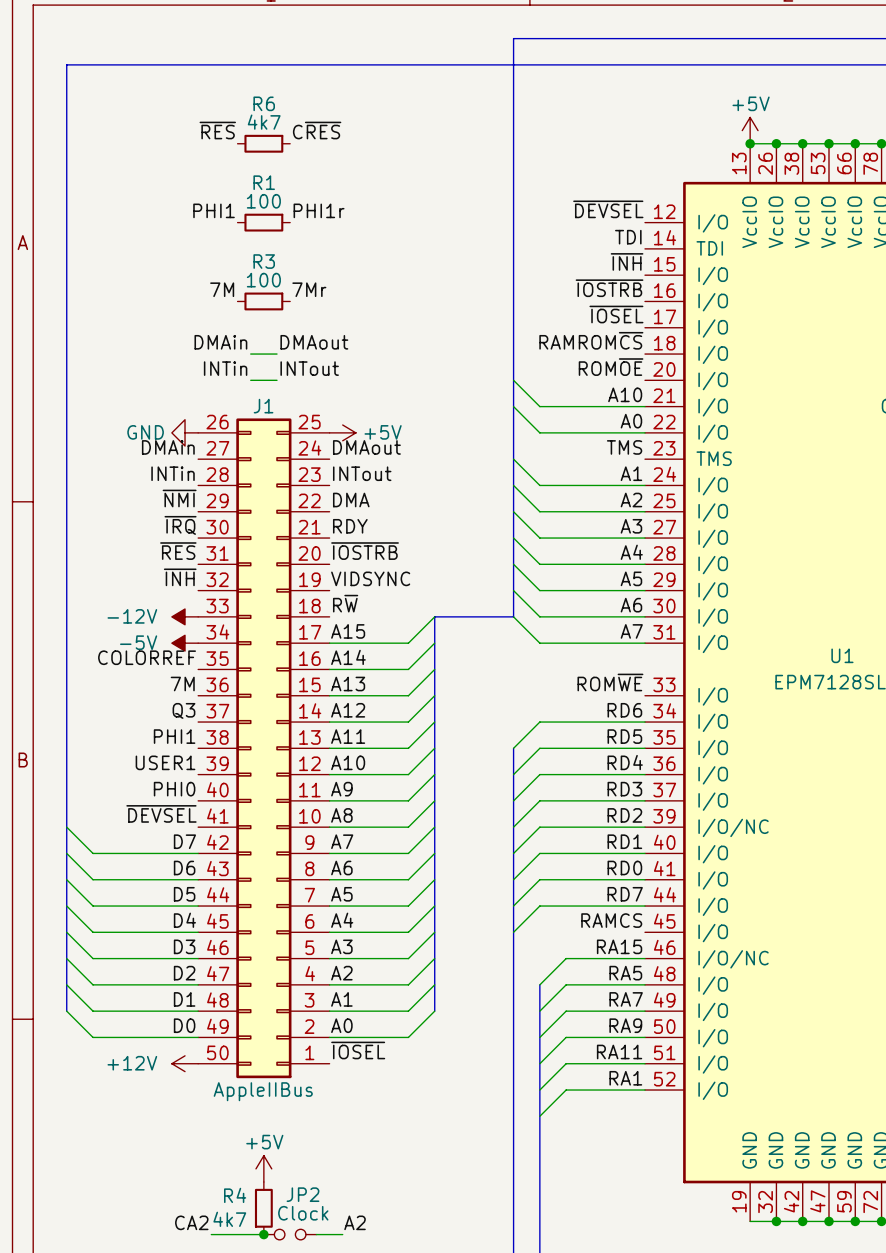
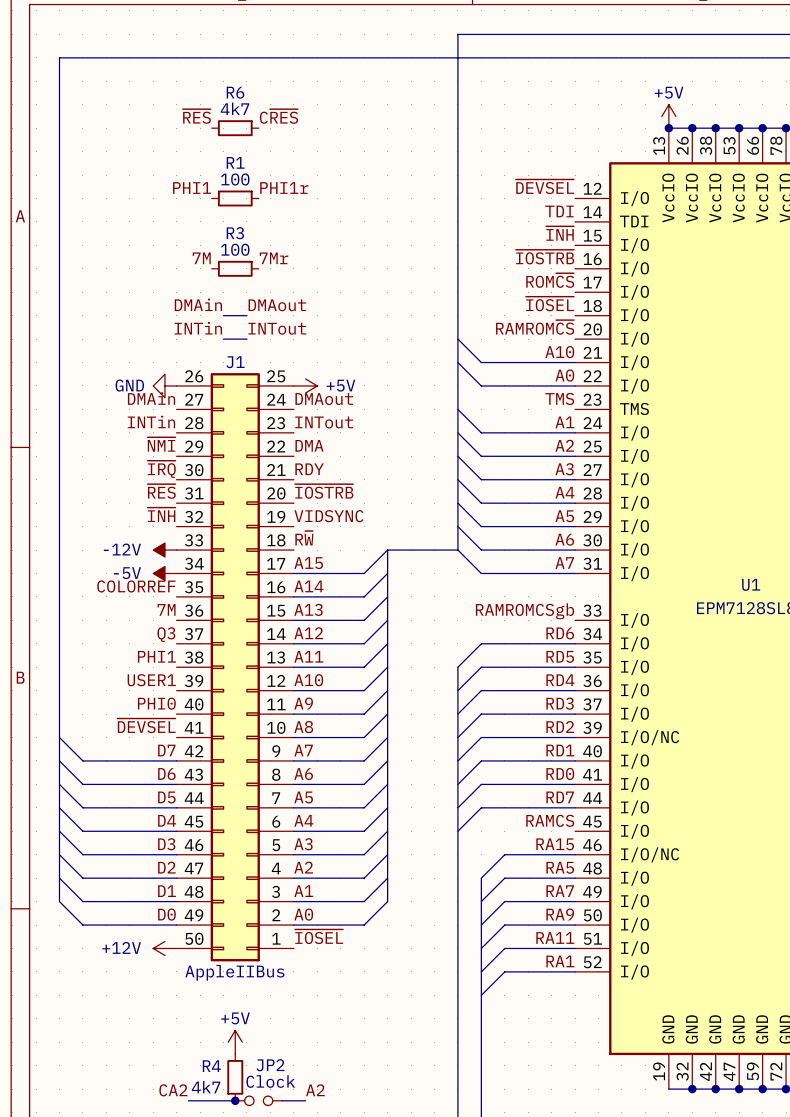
label: ~{IOSEL} (616, 314) -> ROM~{CS} (550, 280)
label: RAMROM~{CS} (591, 340) -> ~{IOSEL} (549, 303)
label: ROM~{OE} (611, 367) -> RAMROM~{CS} (535, 327)
label: ROM~{WE} (610, 682) -> RAMROMCSgb (524, 611)

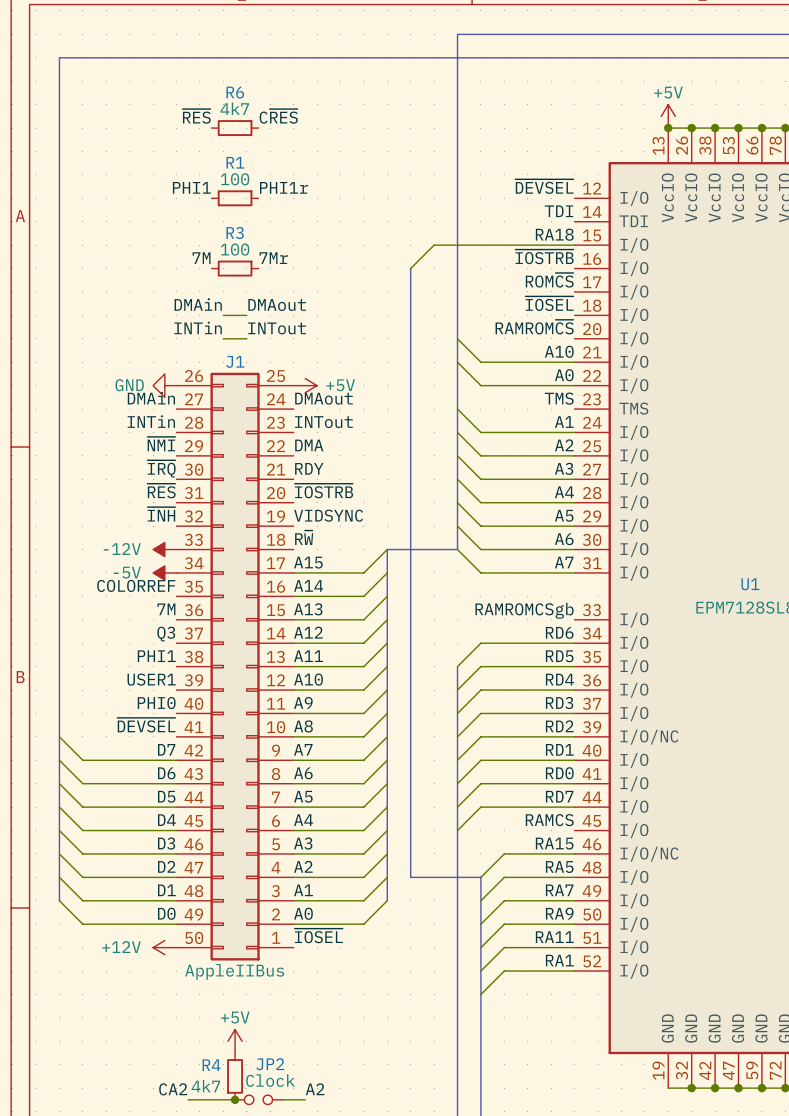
label: ~{INH} (560, 233) -> RA18 (554, 234)
wire: none -> (574, 245) (434, 245) (410, 268)
bus: none -> (410, 268) (410, 877) (480, 877)

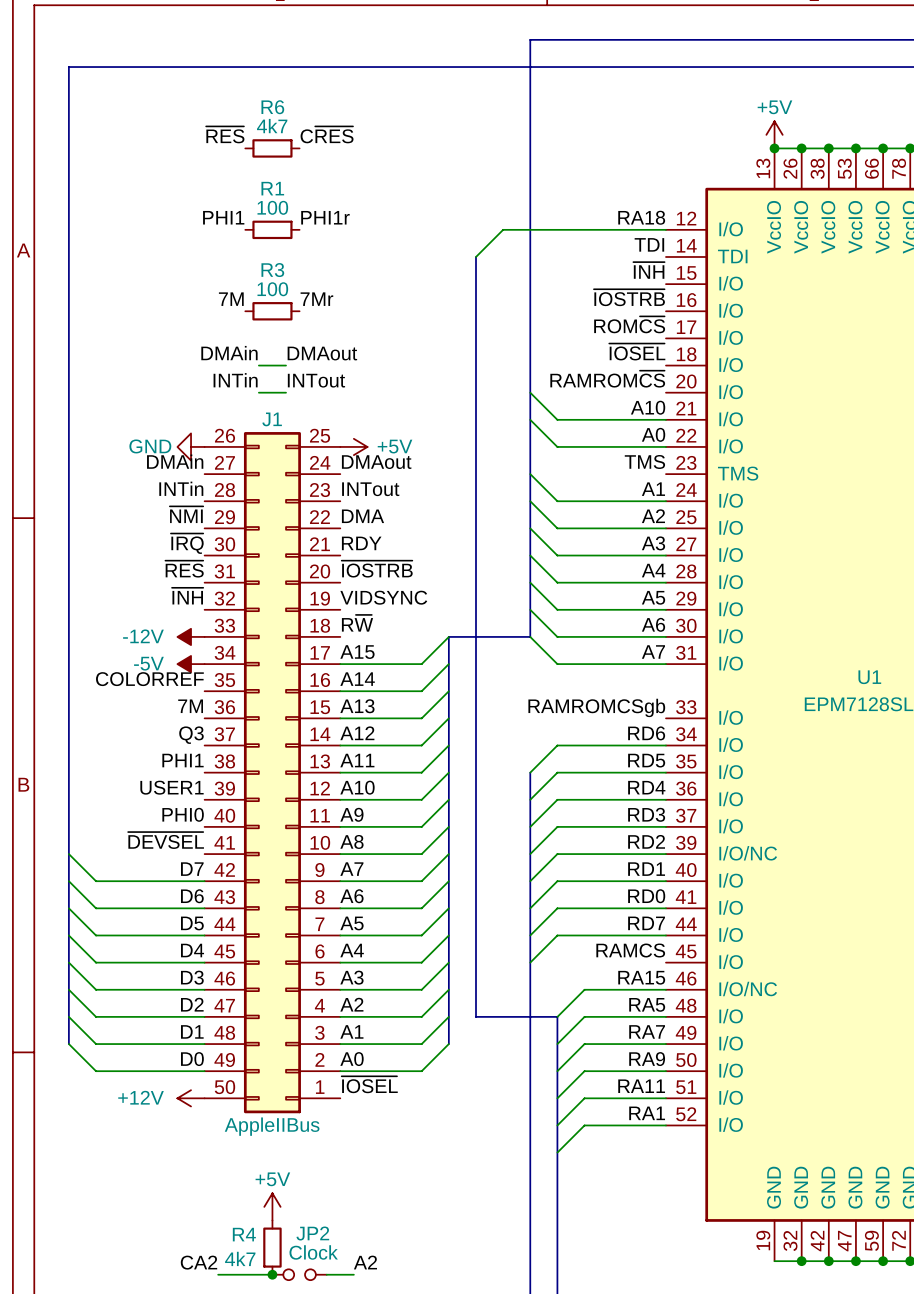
label: ~{DEVSEL} (544, 186) -> RA18 (641, 217)
bus: none -> (476, 256) (476, 311)
label: RA18 (554, 234) -> ~{INH} (648, 270)
wire: (574, 245) (434, 245) (410, 268) -> (665, 229) (503, 229) (476, 256)

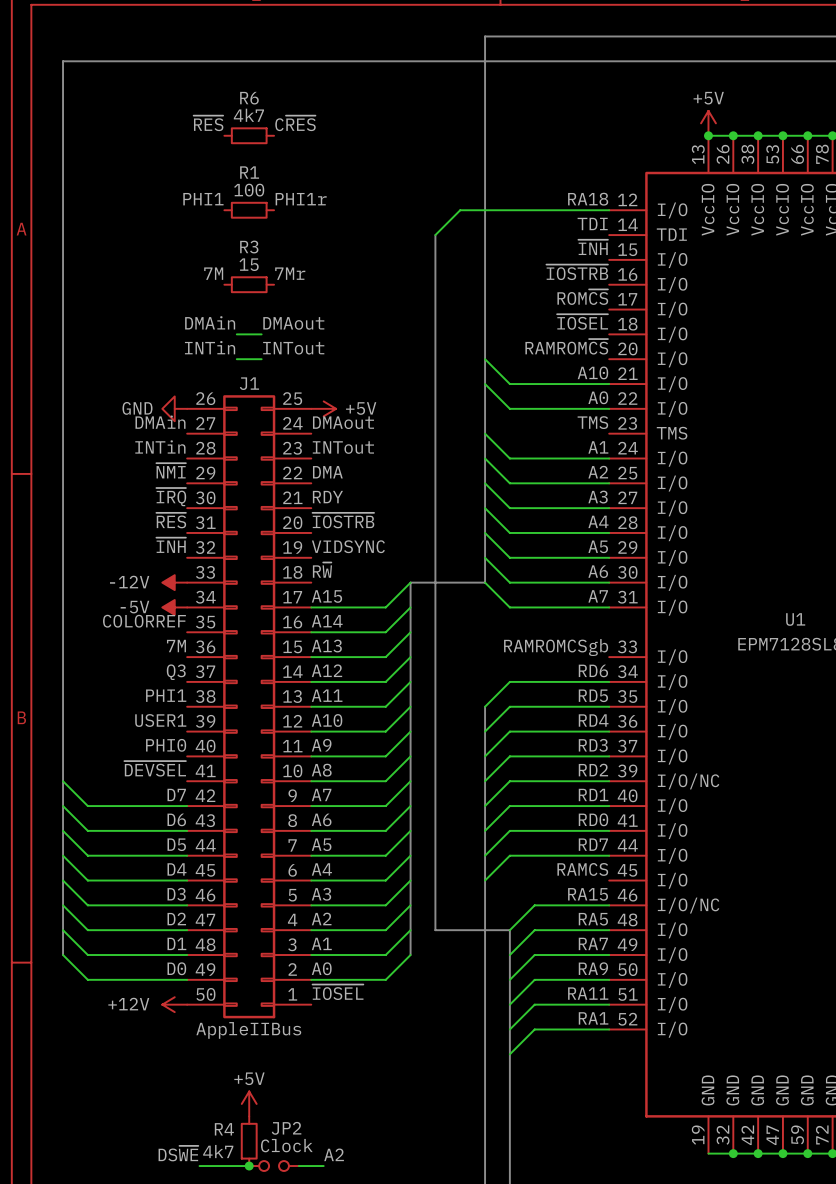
R3 value: 100 (272, 289) -> 15 (249, 264)
label: CA2 (198, 1262) -> DS~{WE} (178, 1153)

